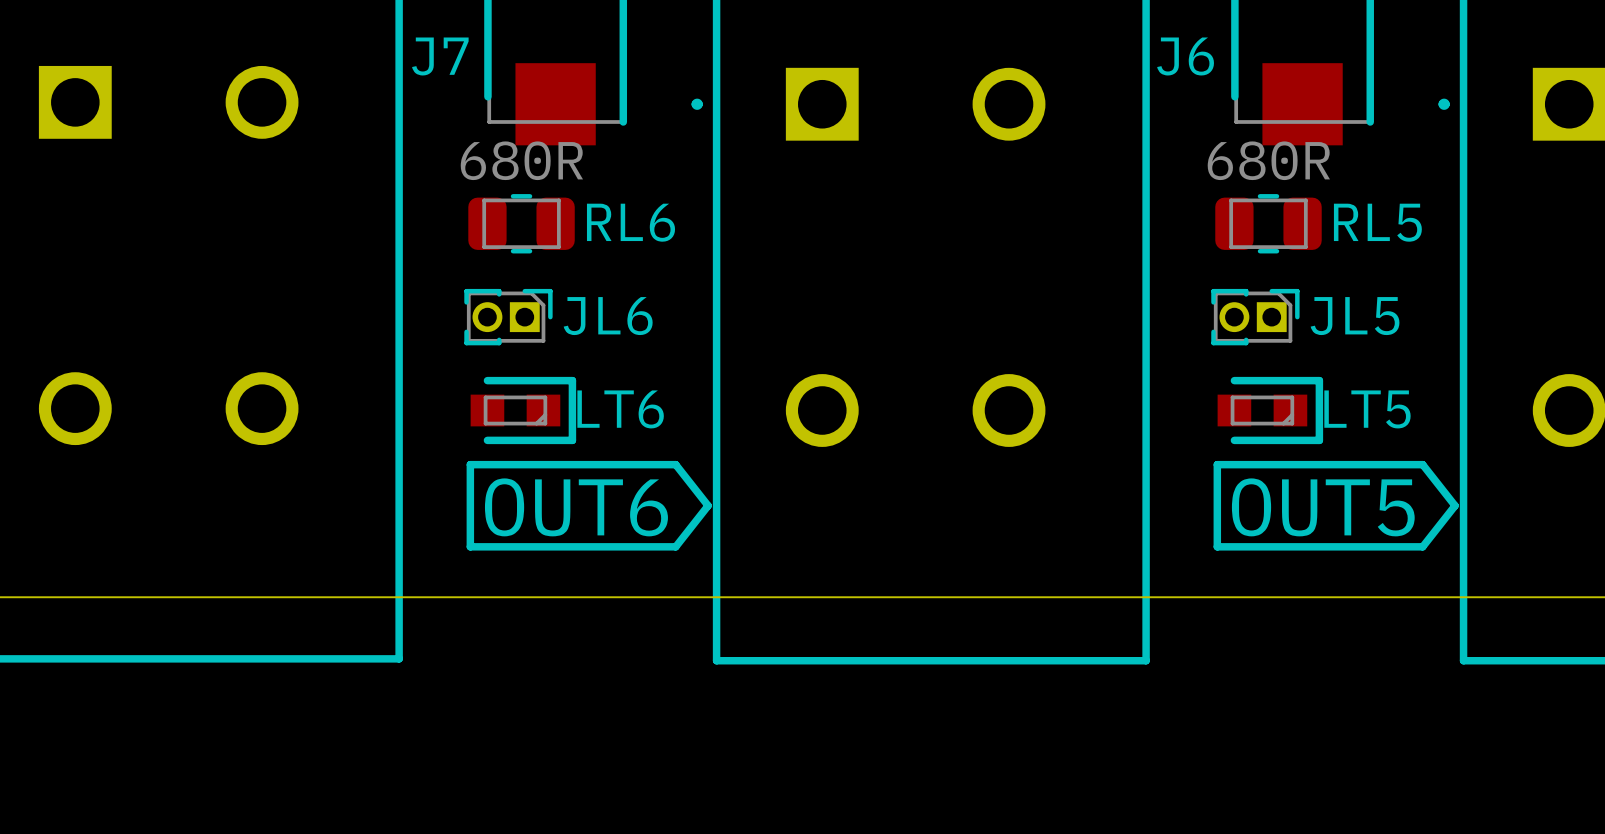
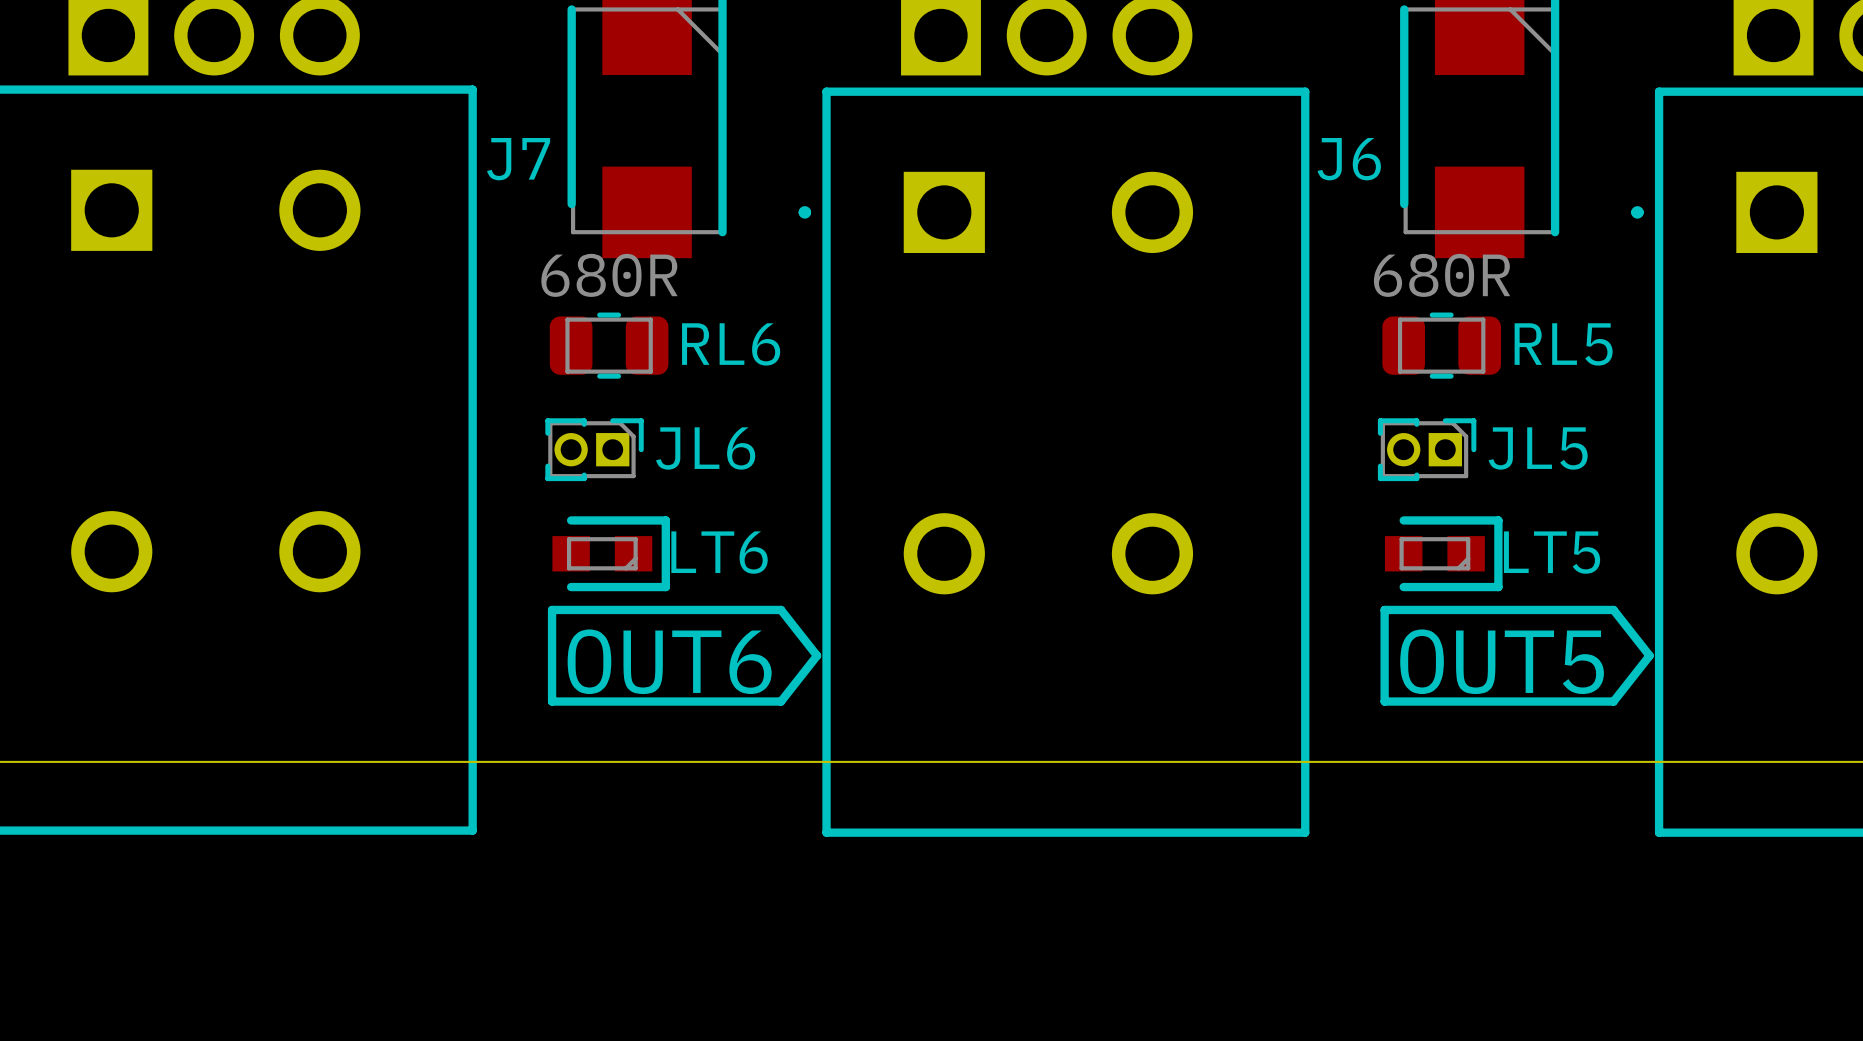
drawing shape: [466, 460, 712, 551] -> [547, 605, 822, 706]
drawing shape: [1213, 460, 1459, 551] -> [1380, 605, 1654, 706]

